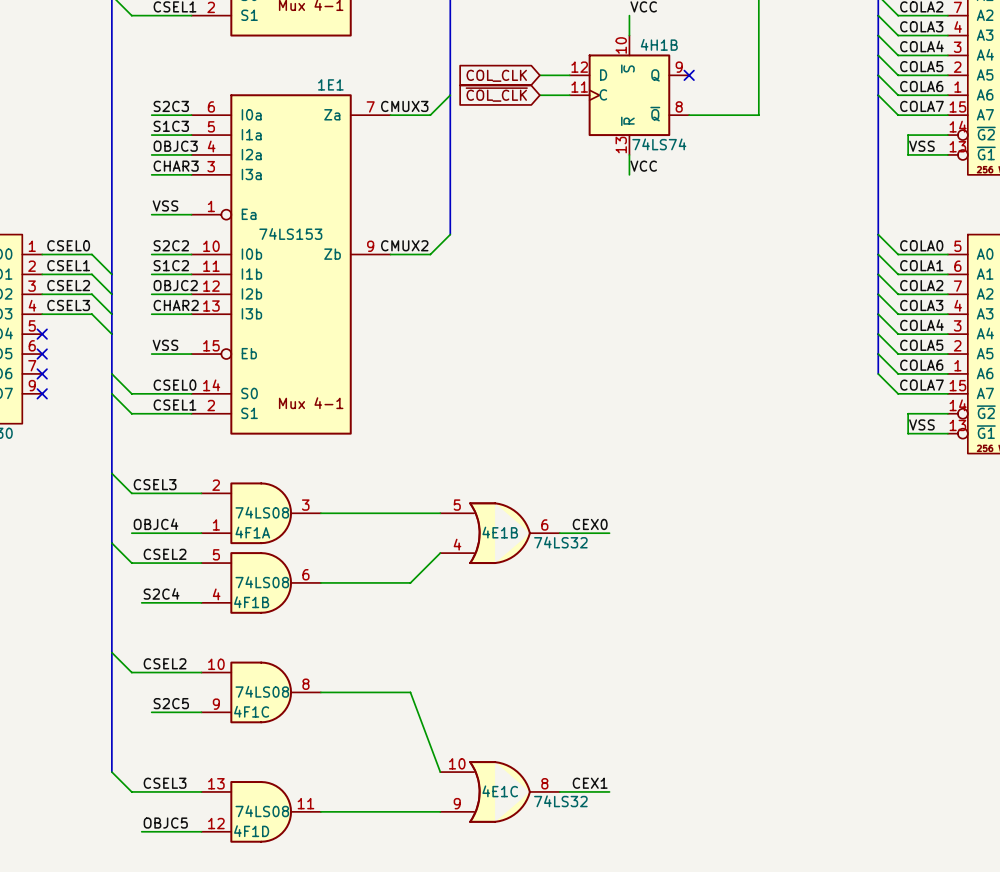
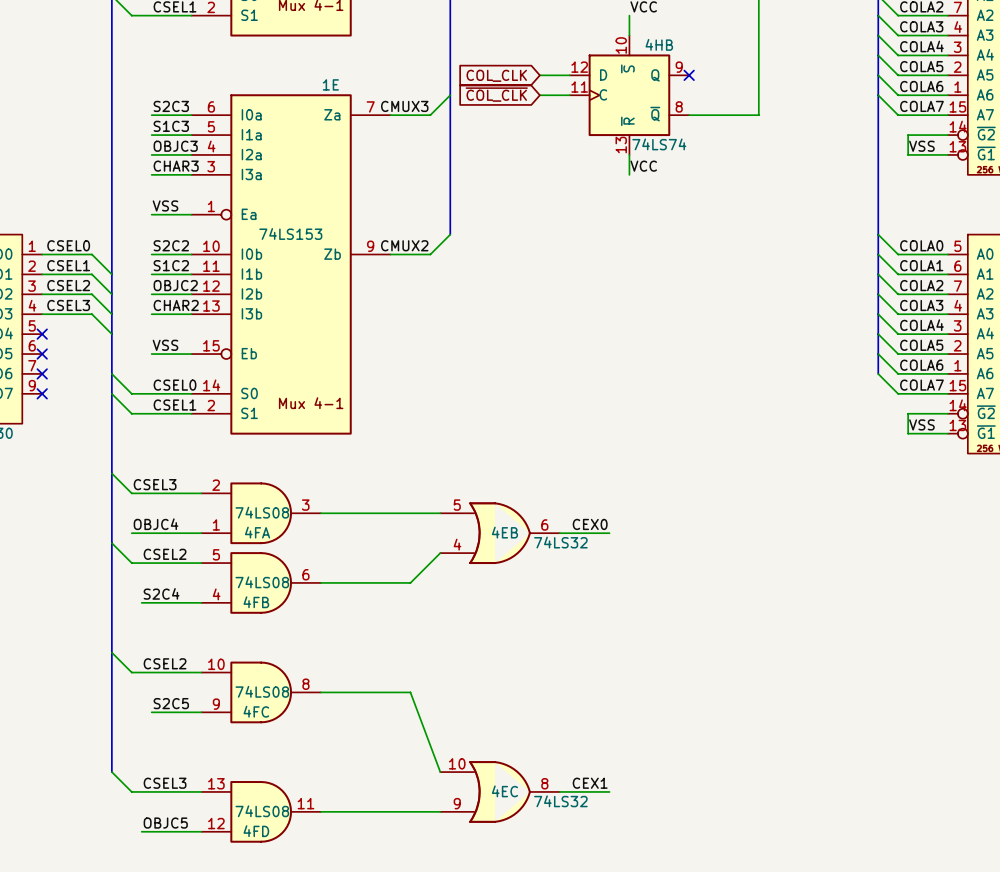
4H1B name: 4H1B (659, 44) -> 4HB (659, 44)
1E1 name: 1E1 (330, 84) -> 1E (330, 84)
4F1A name: 4F1A (252, 532) -> 4FA (257, 532)
4E1B name: 4E1B (500, 532) -> 4EB (504, 532)
4F1B name: 4F1B (251, 602) -> 4FB (256, 602)
4F1C name: 4F1C (251, 711) -> 4FC (256, 711)
4E1C name: 4E1C (500, 791) -> 4EC (504, 791)
4F1D name: 4F1D (251, 831) -> 4FD (256, 831)

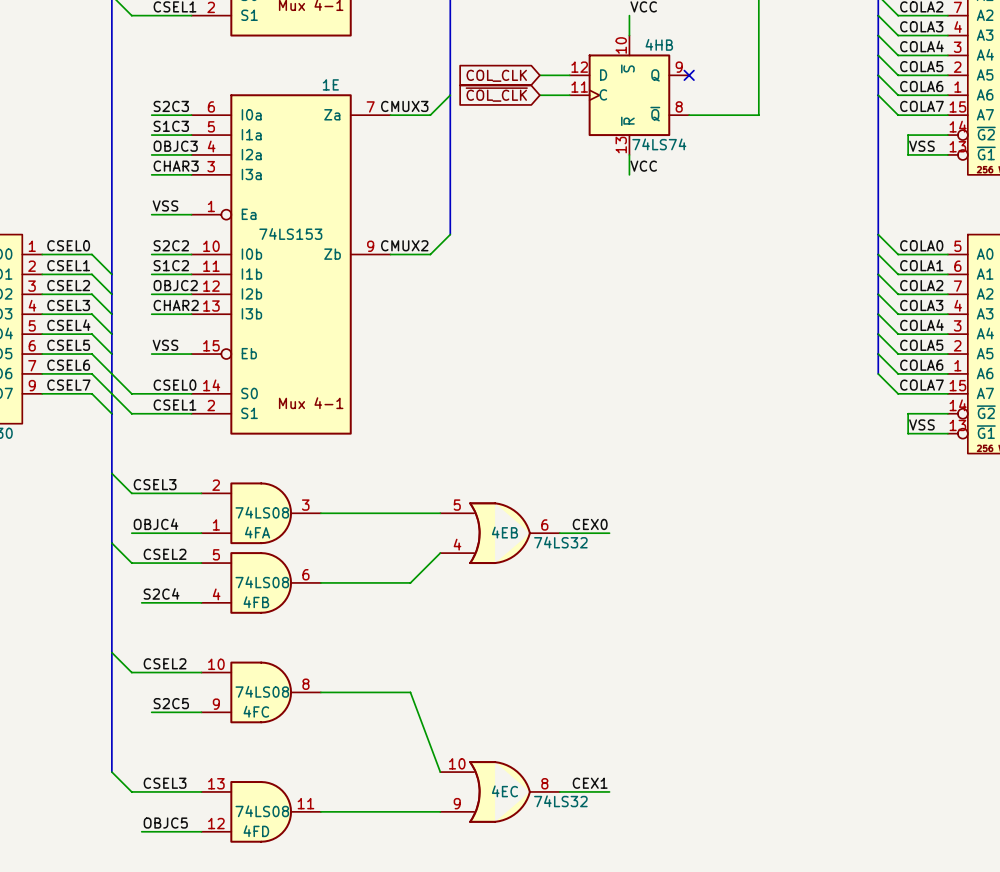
label: none -> CSEL4 (68, 325)
wire: none -> (42, 334) (91, 334) (111, 354)
no-connect mark: (42, 334) -> none
label: none -> CSEL5 (68, 345)
wire: none -> (42, 354) (91, 354) (111, 373)
no-connect mark: (42, 354) -> none
label: none -> CSEL6 (68, 365)
wire: none -> (42, 373) (91, 373) (111, 393)
no-connect mark: (42, 373) -> none
label: none -> CSEL7 (68, 385)
wire: none -> (42, 393) (91, 393) (111, 413)
no-connect mark: (42, 393) -> none

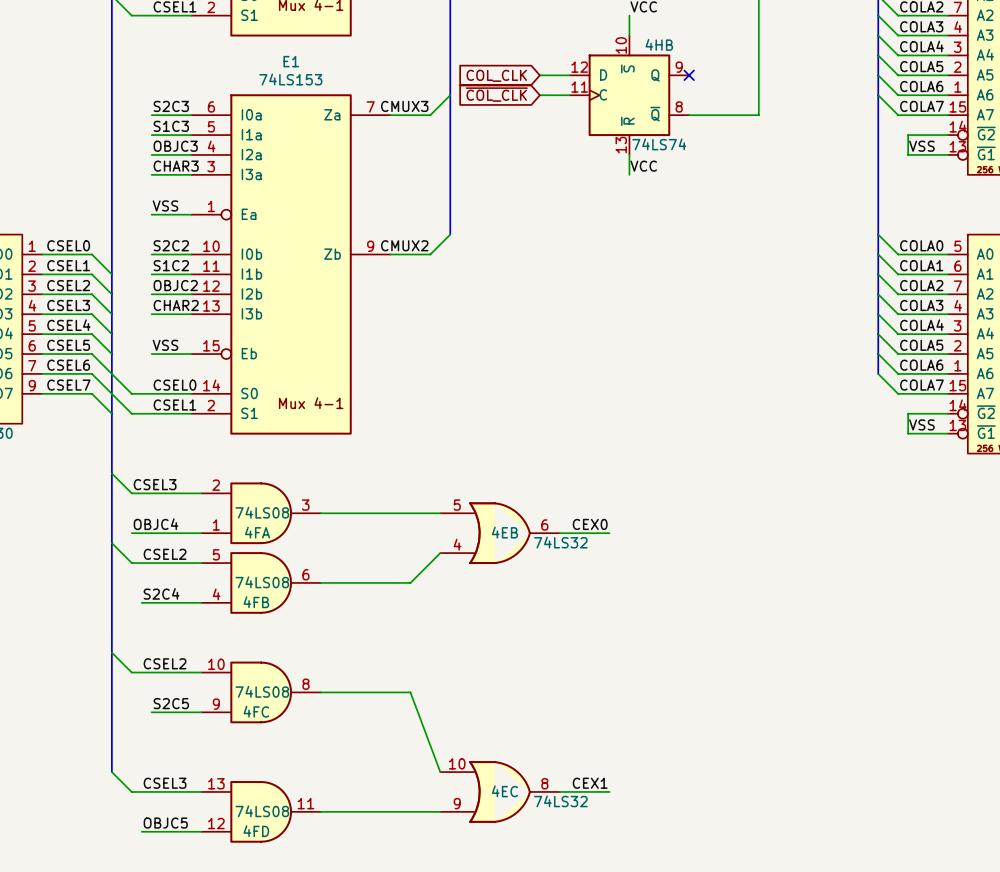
1E name: 1E (330, 84) -> E1 (291, 61)
1E value position: 74LS153 (290, 233) -> 74LS153 (290, 79)

